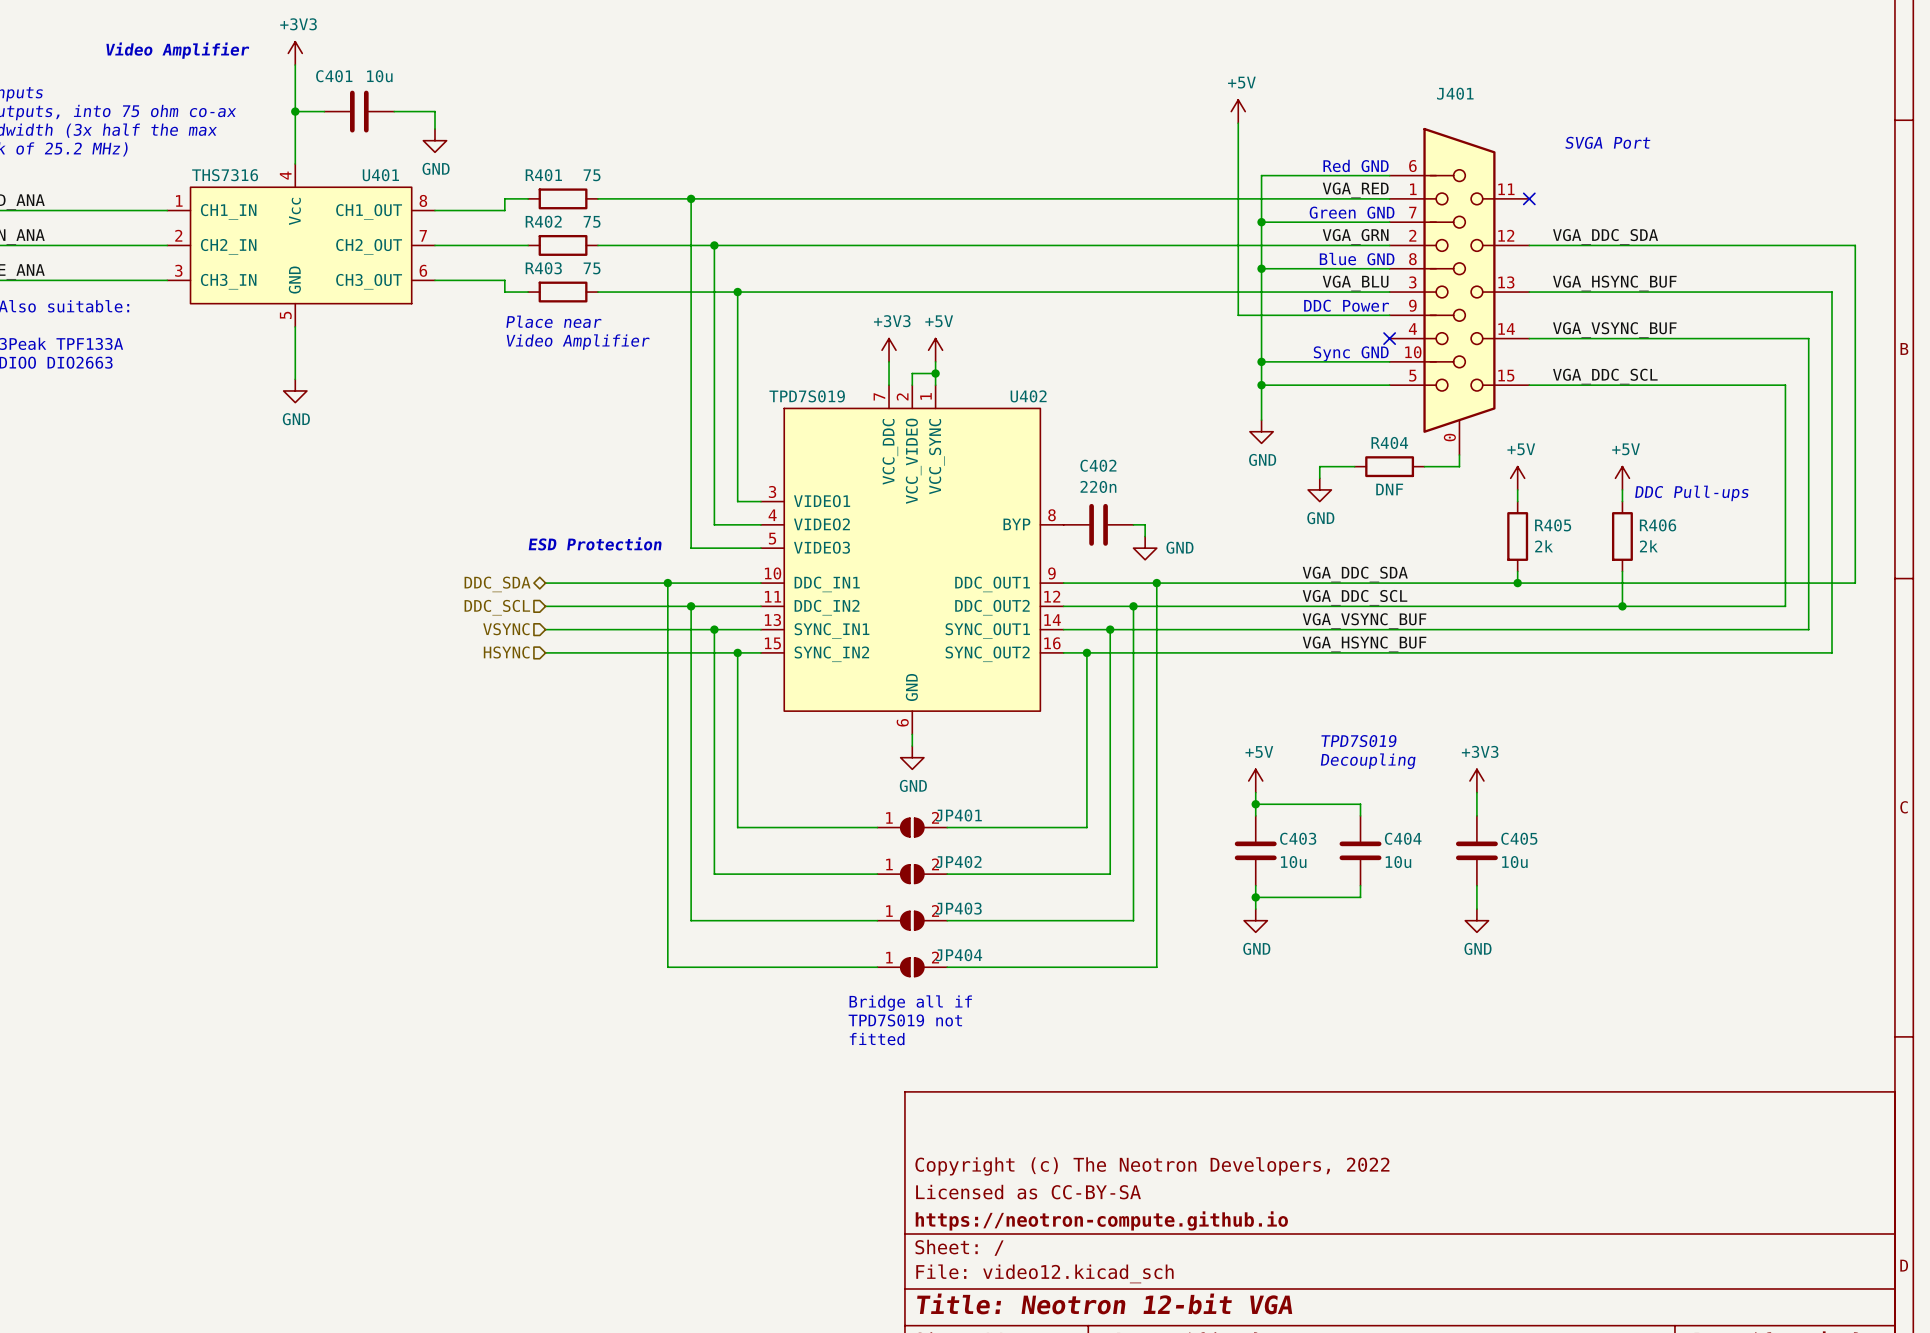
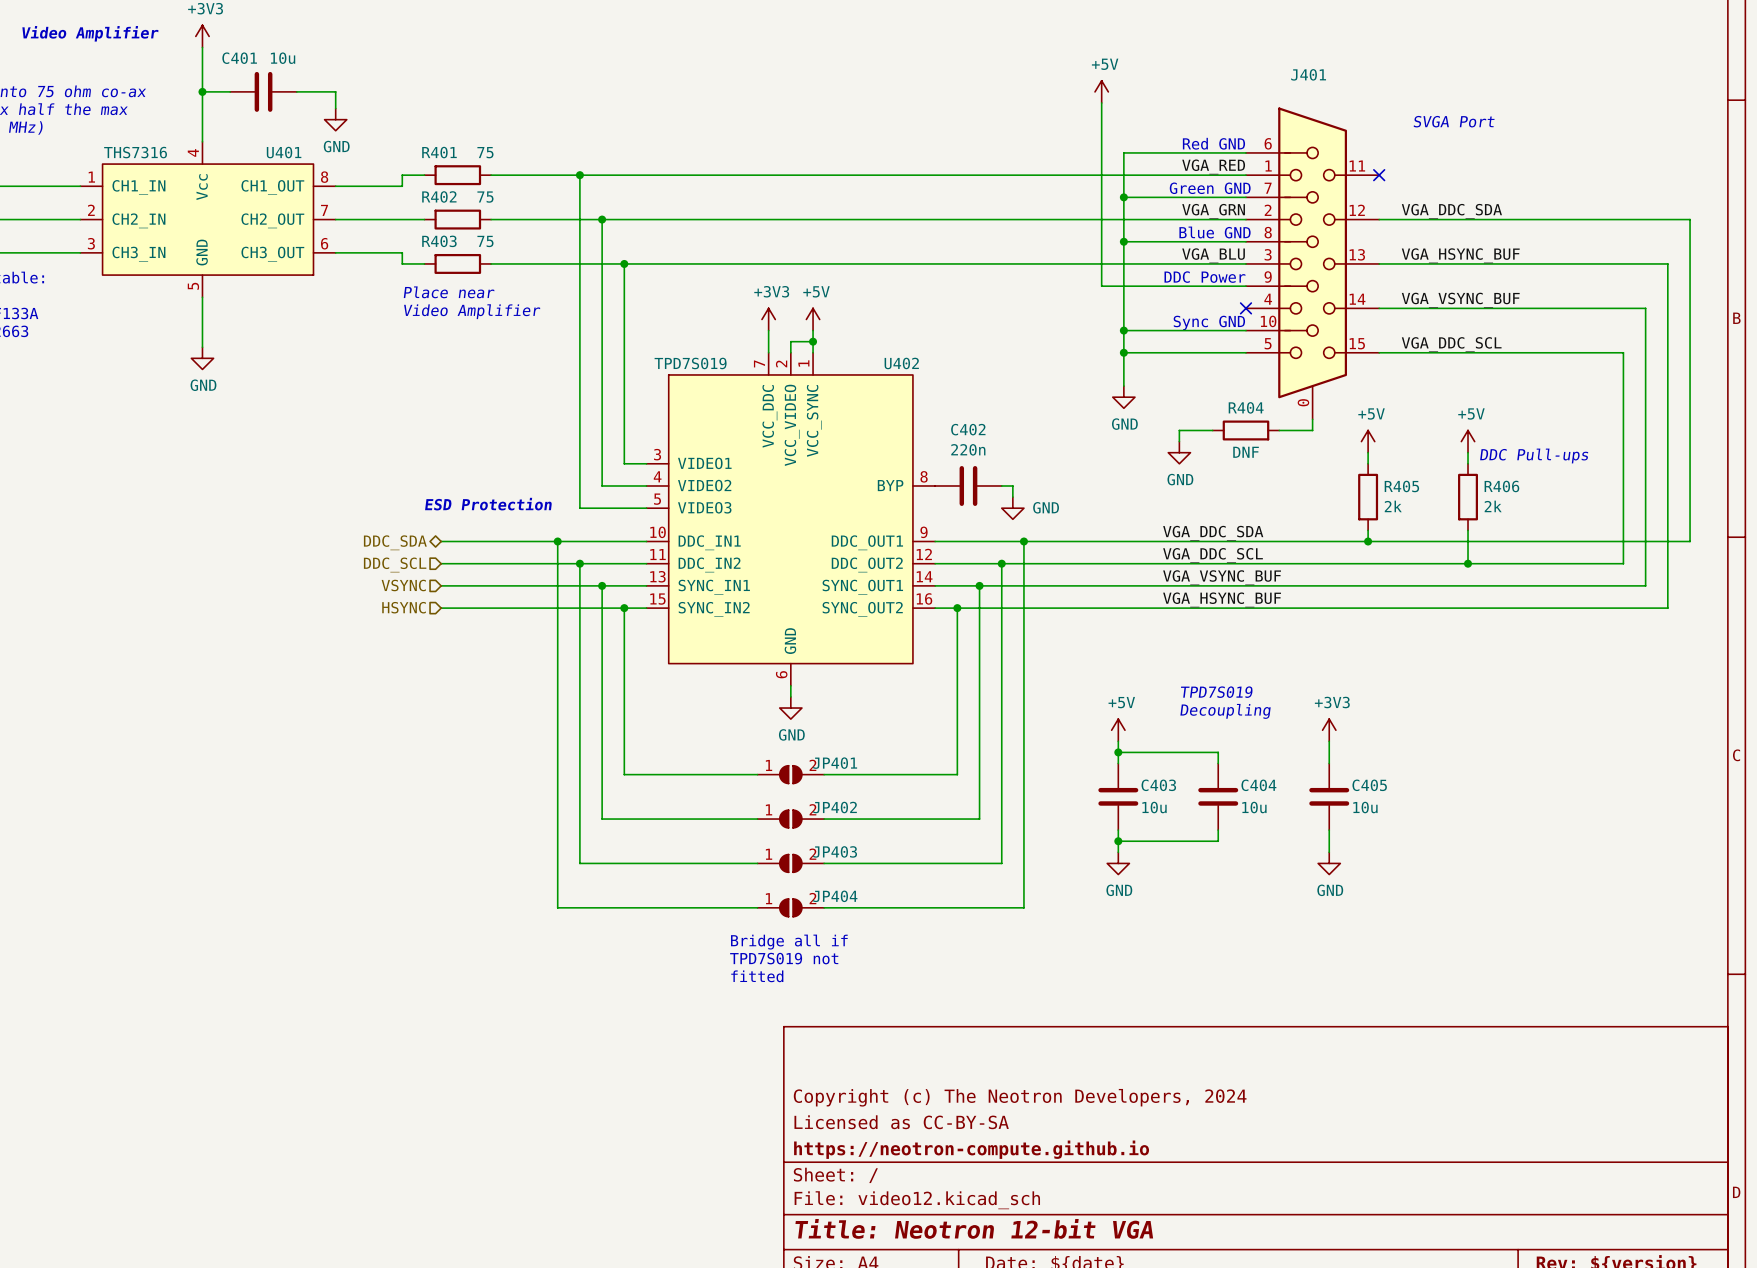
title block: Copyright (c) The Neotron Developers, 2022 (1152, 1166) -> Copyright (c) The Neotron Developers, 2024 (1020, 1097)

